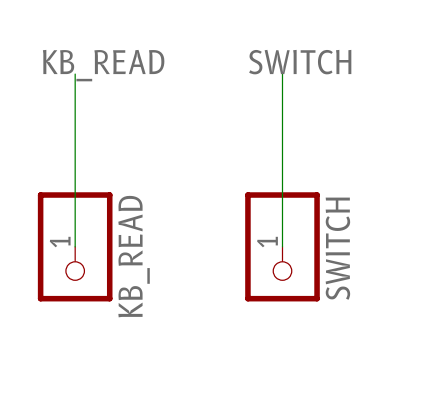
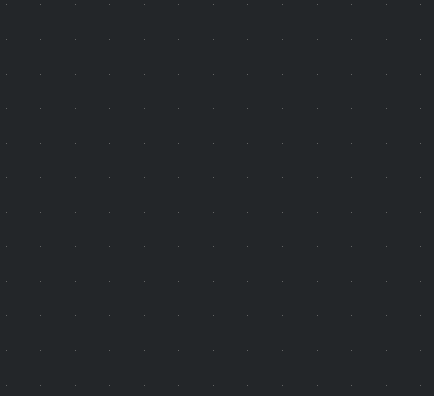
label: SWITCH (300, 62) -> none
label: KB_READ (103, 65) -> none
wire: (75, 74) (75, 246) -> none
wire: (282, 74) (282, 246) -> none
KB_READ: (75, 246) -> none
SWITCH: (282, 246) -> none

